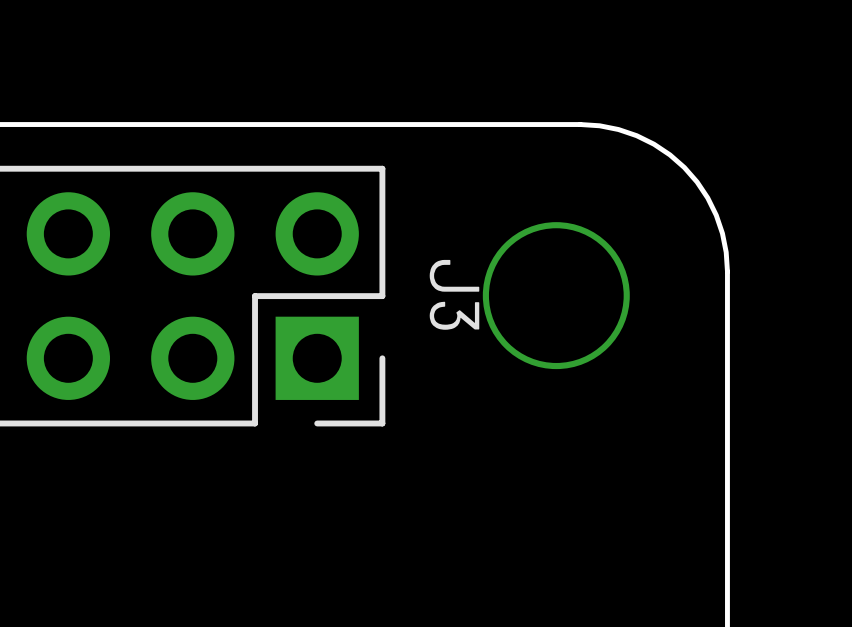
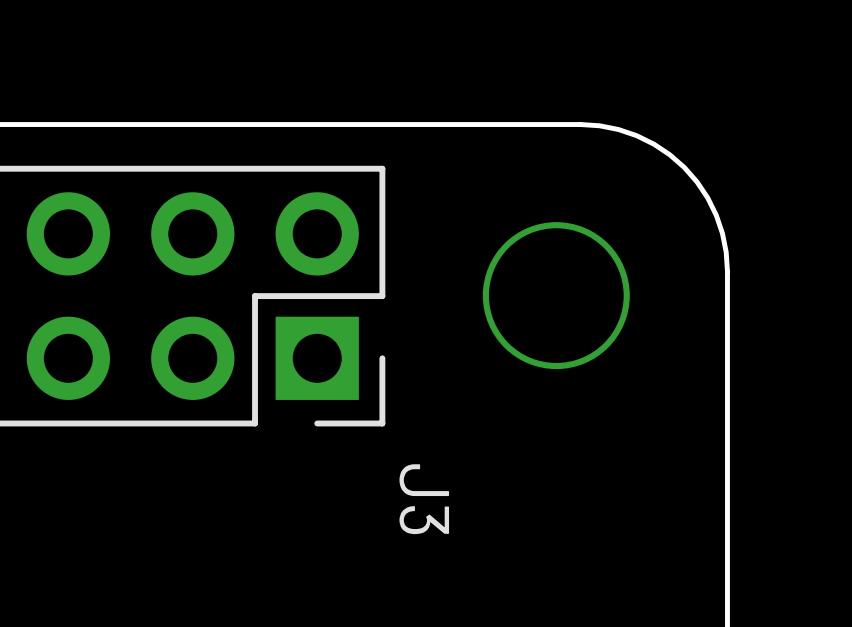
J3 name position: J3 (454, 294) -> J3 (424, 499)

